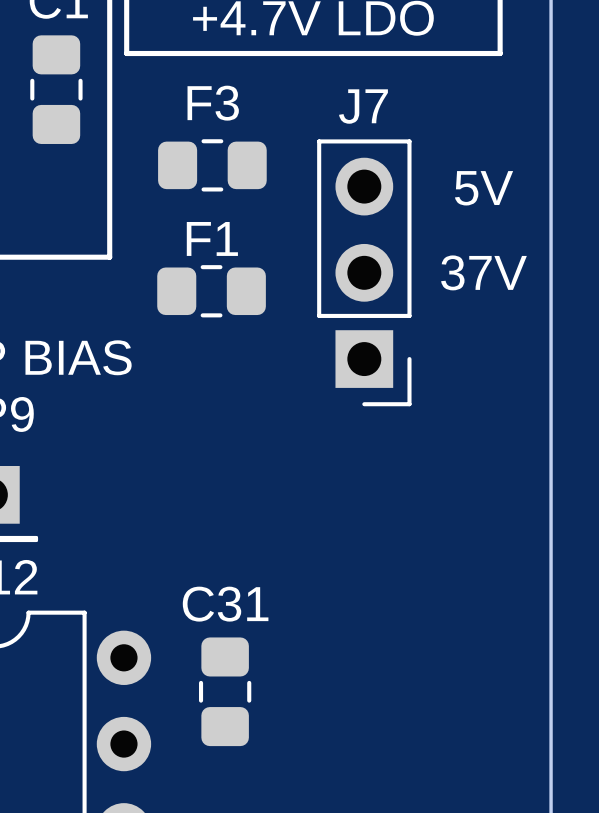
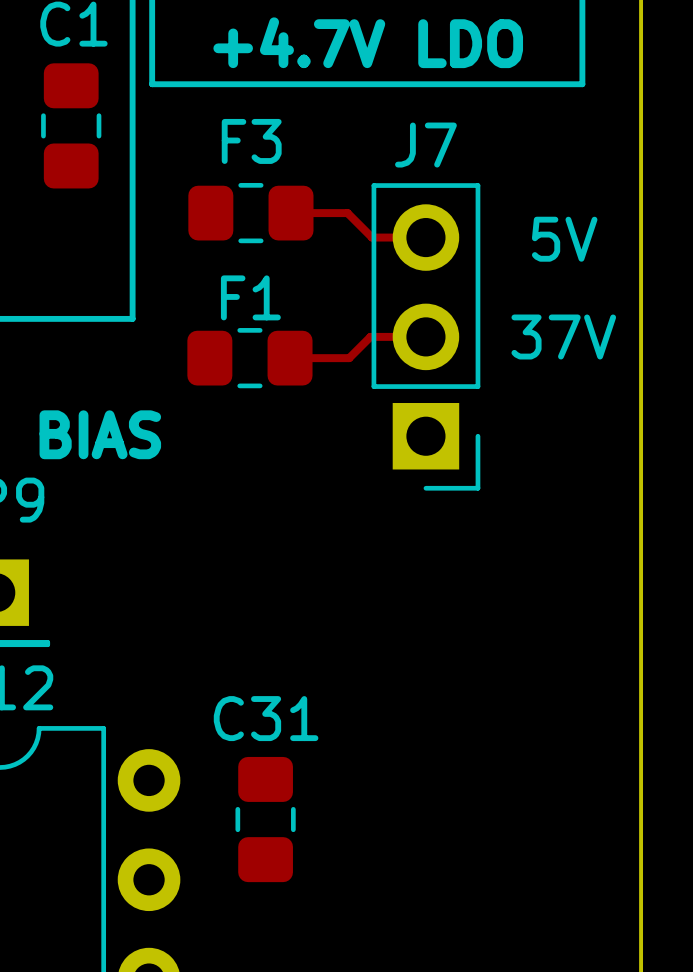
track: none -> (291, 213) (347, 213) (372, 237) (425, 237)
track: none -> (425, 336) (370, 336) (349, 358) (290, 358)

